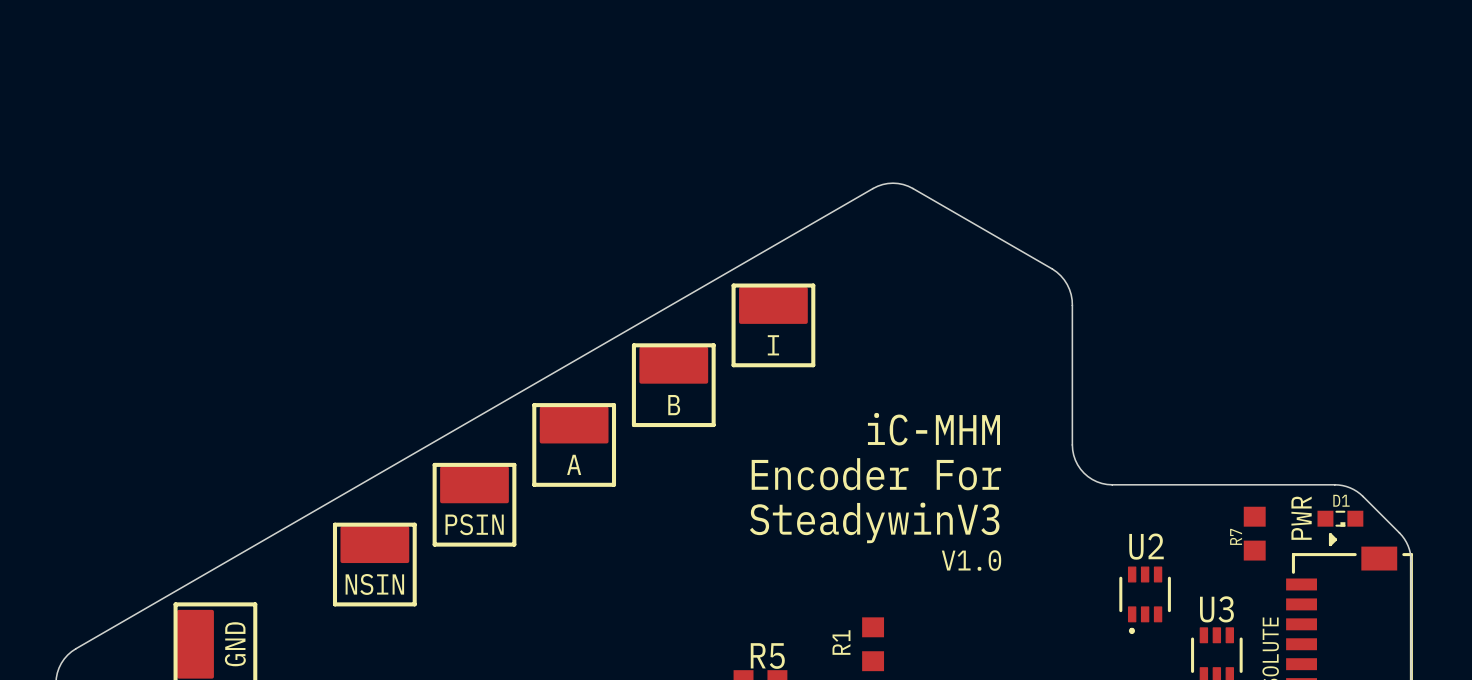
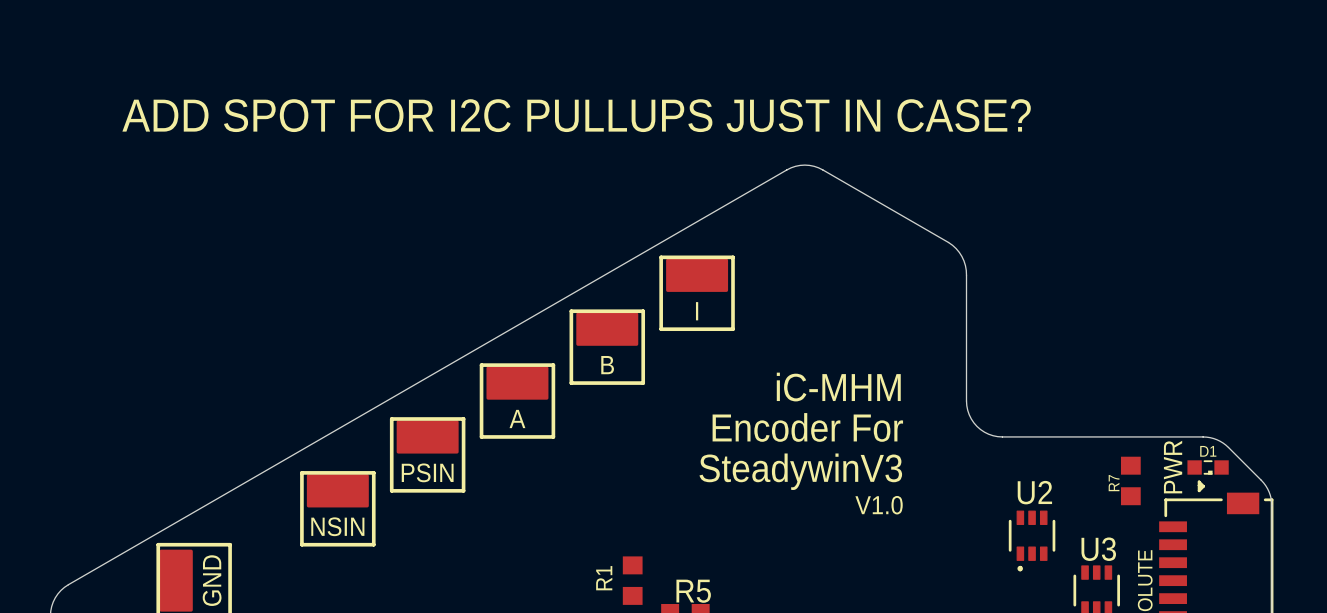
text: none -> ADD SPOT FOR I2C PULLUPS JUST IN CASE? (576, 115)
R1 position: (873, 644) -> (632, 580)

